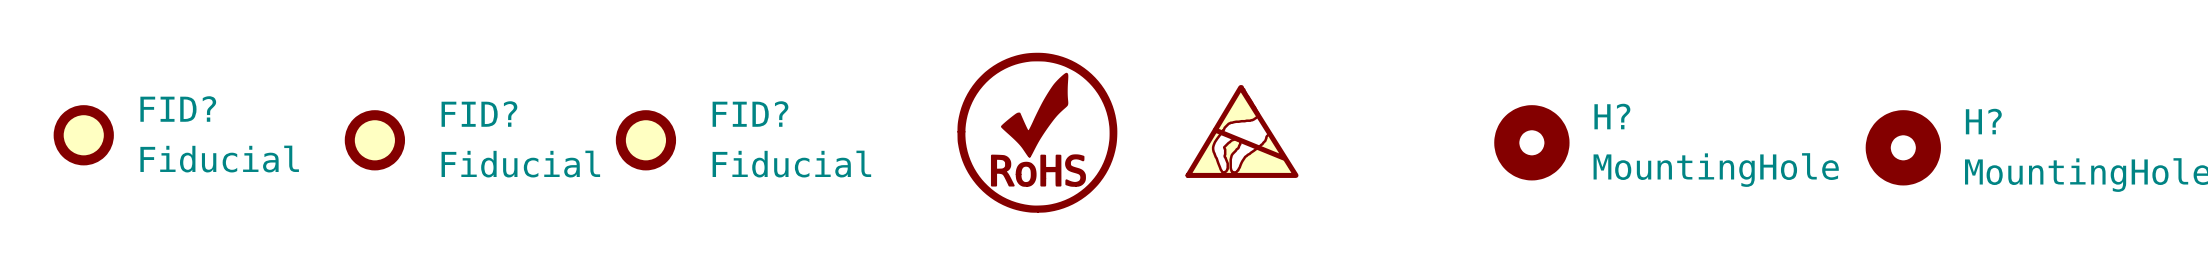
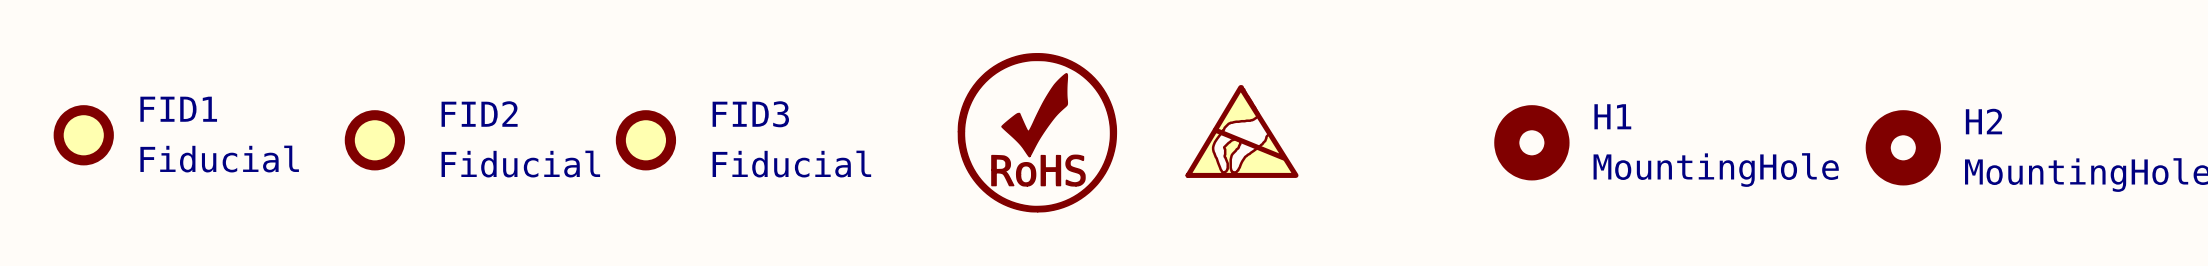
FID? name: FID? (178, 109) -> FID1 (178, 109)
FID? name: FID? (479, 114) -> FID2 (479, 114)
FID? name: FID? (750, 114) -> FID3 (750, 114)
H? name: H? (1612, 116) -> H1 (1612, 116)
H? name: H? (1983, 121) -> H2 (1983, 121)

